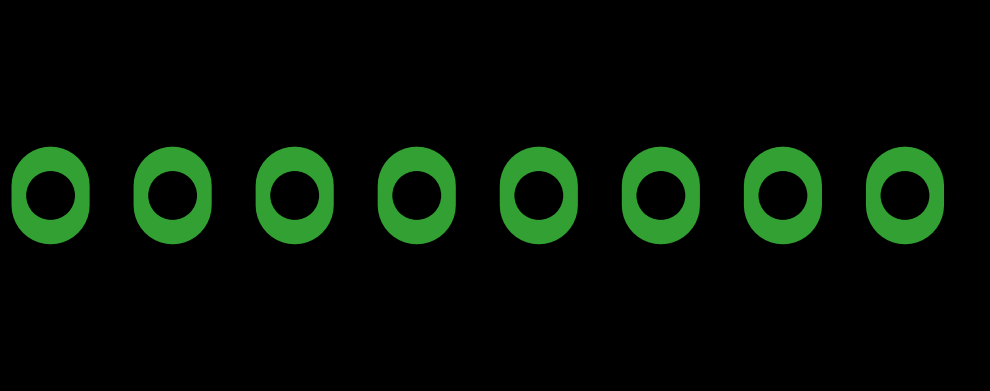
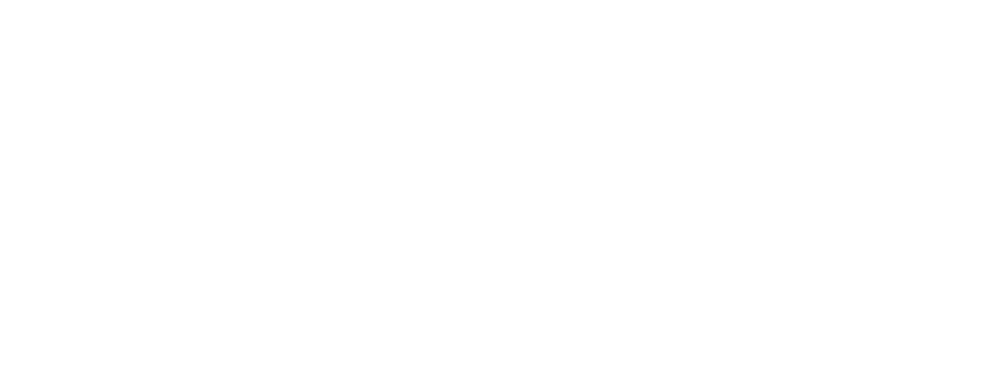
part: (477, 195) -> none

